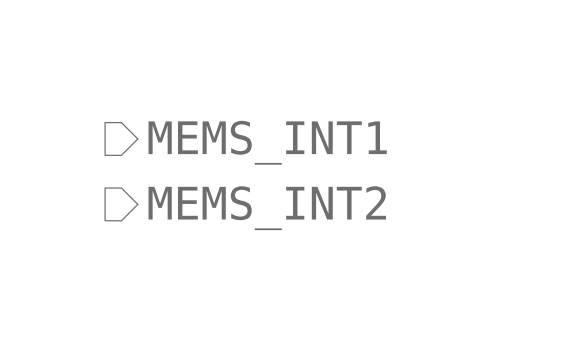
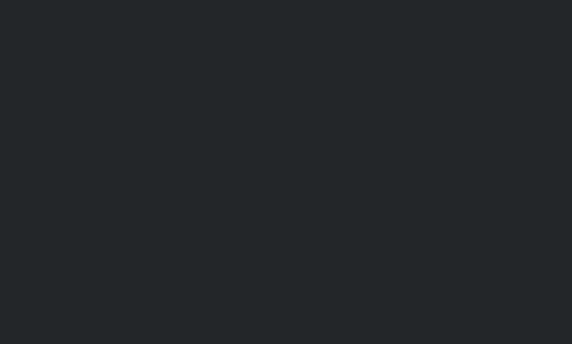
hierarchical label: MEMS_INT1 (267, 142) -> none
hierarchical label: MEMS_INT2 (267, 208) -> none

